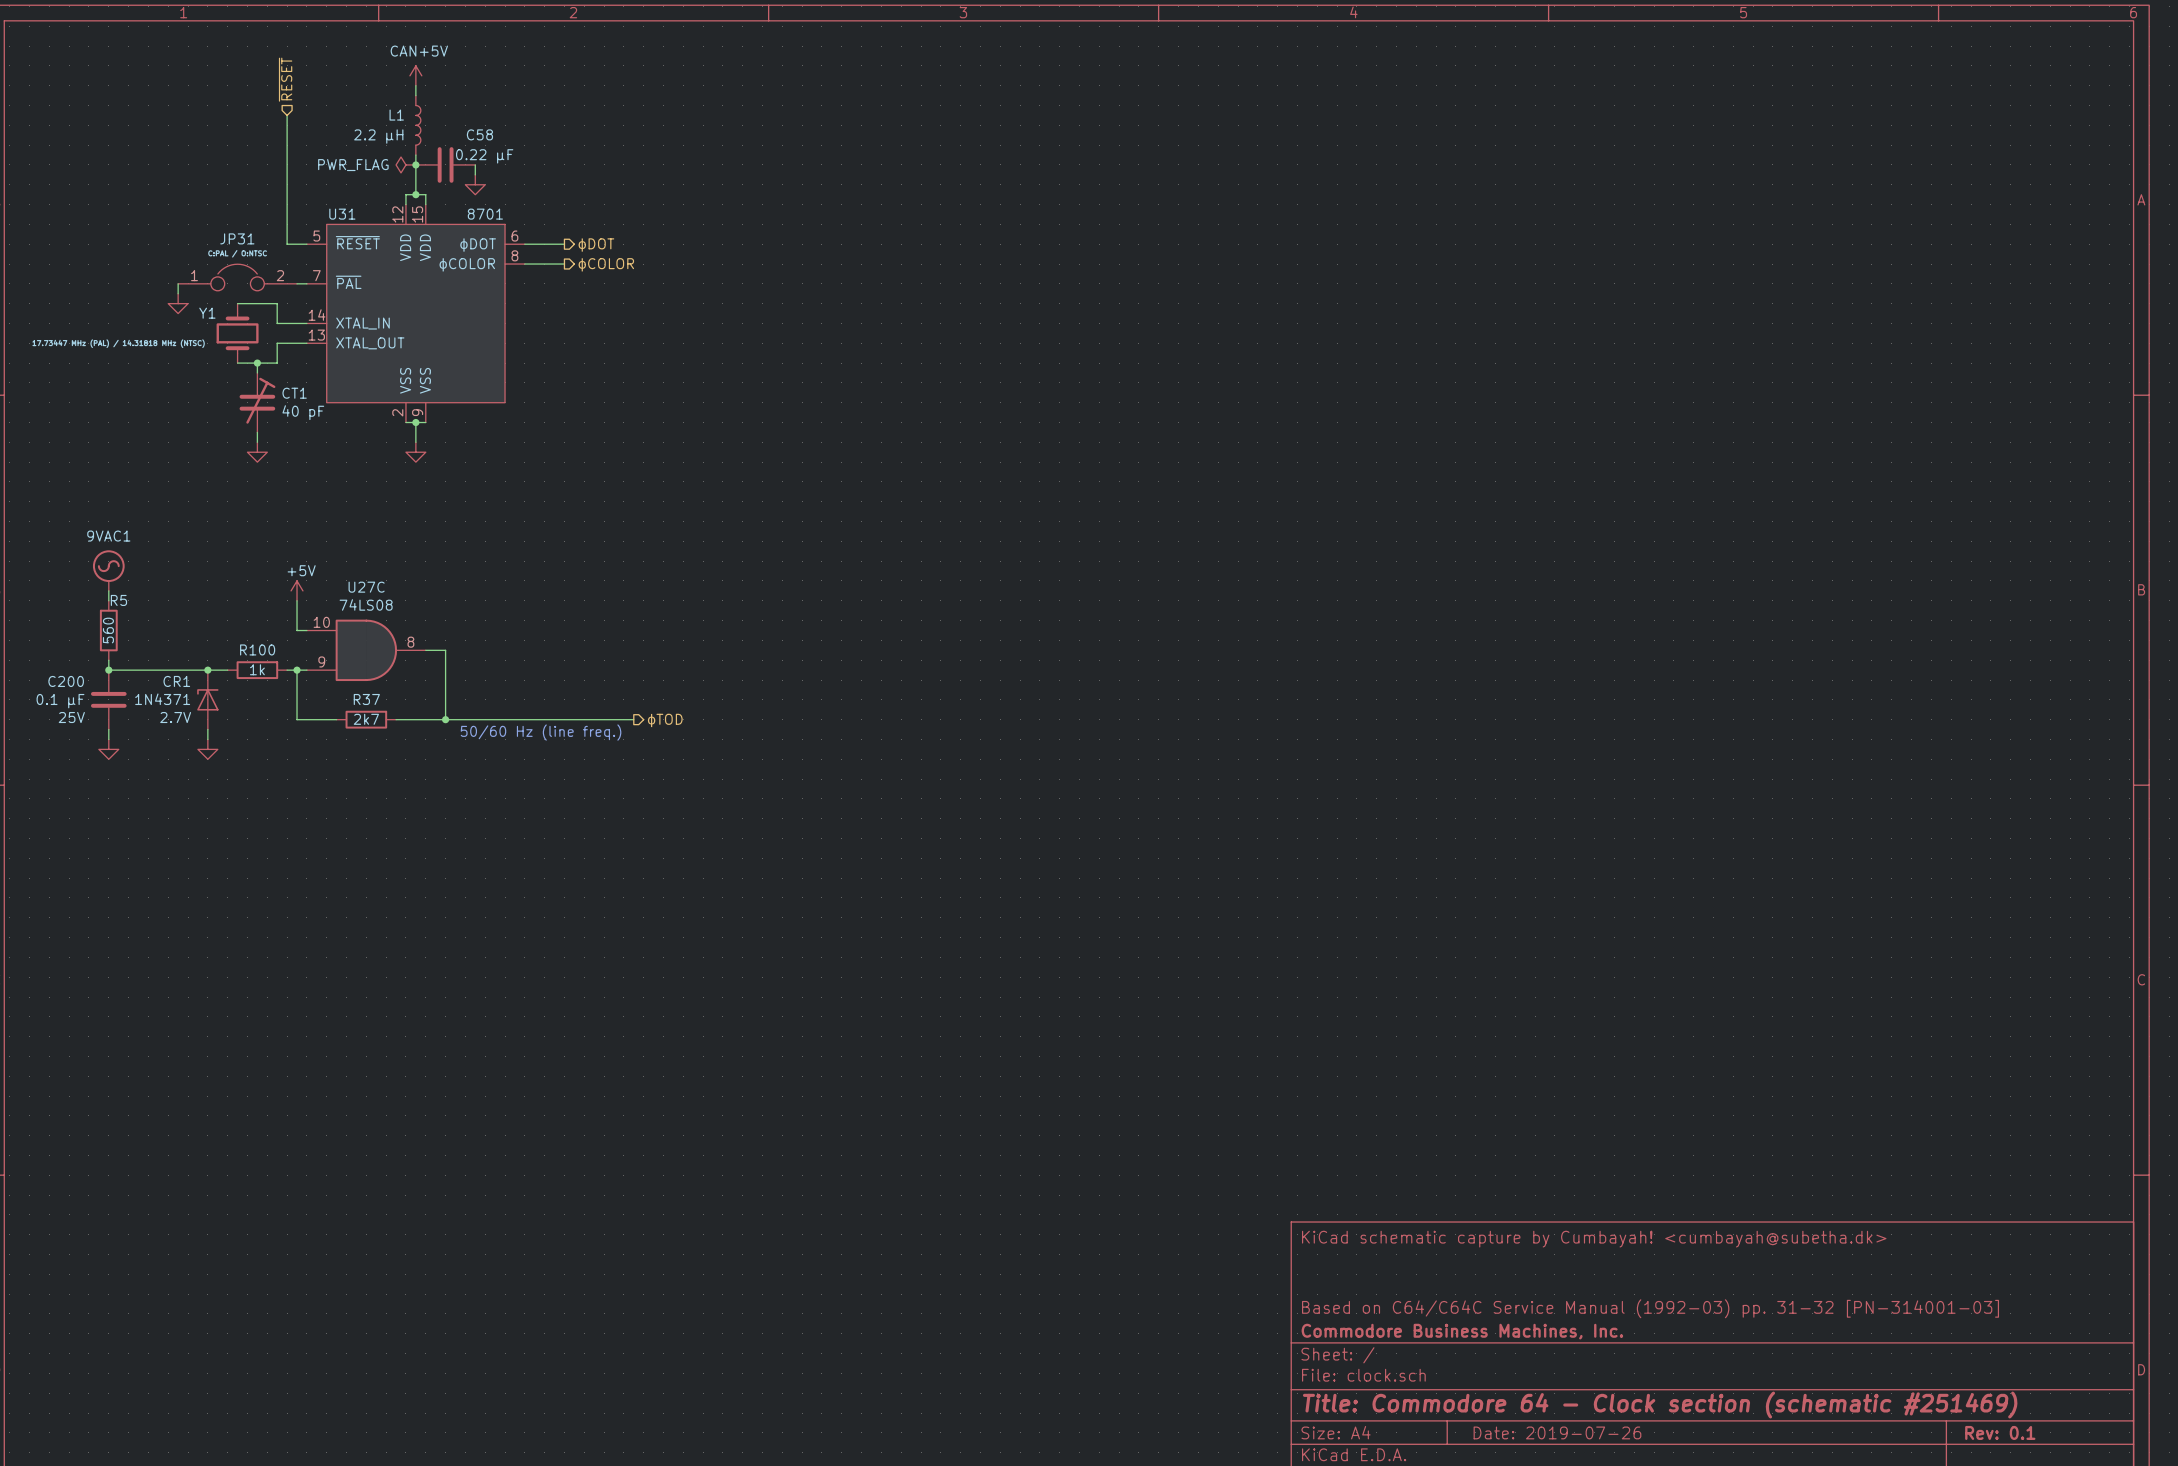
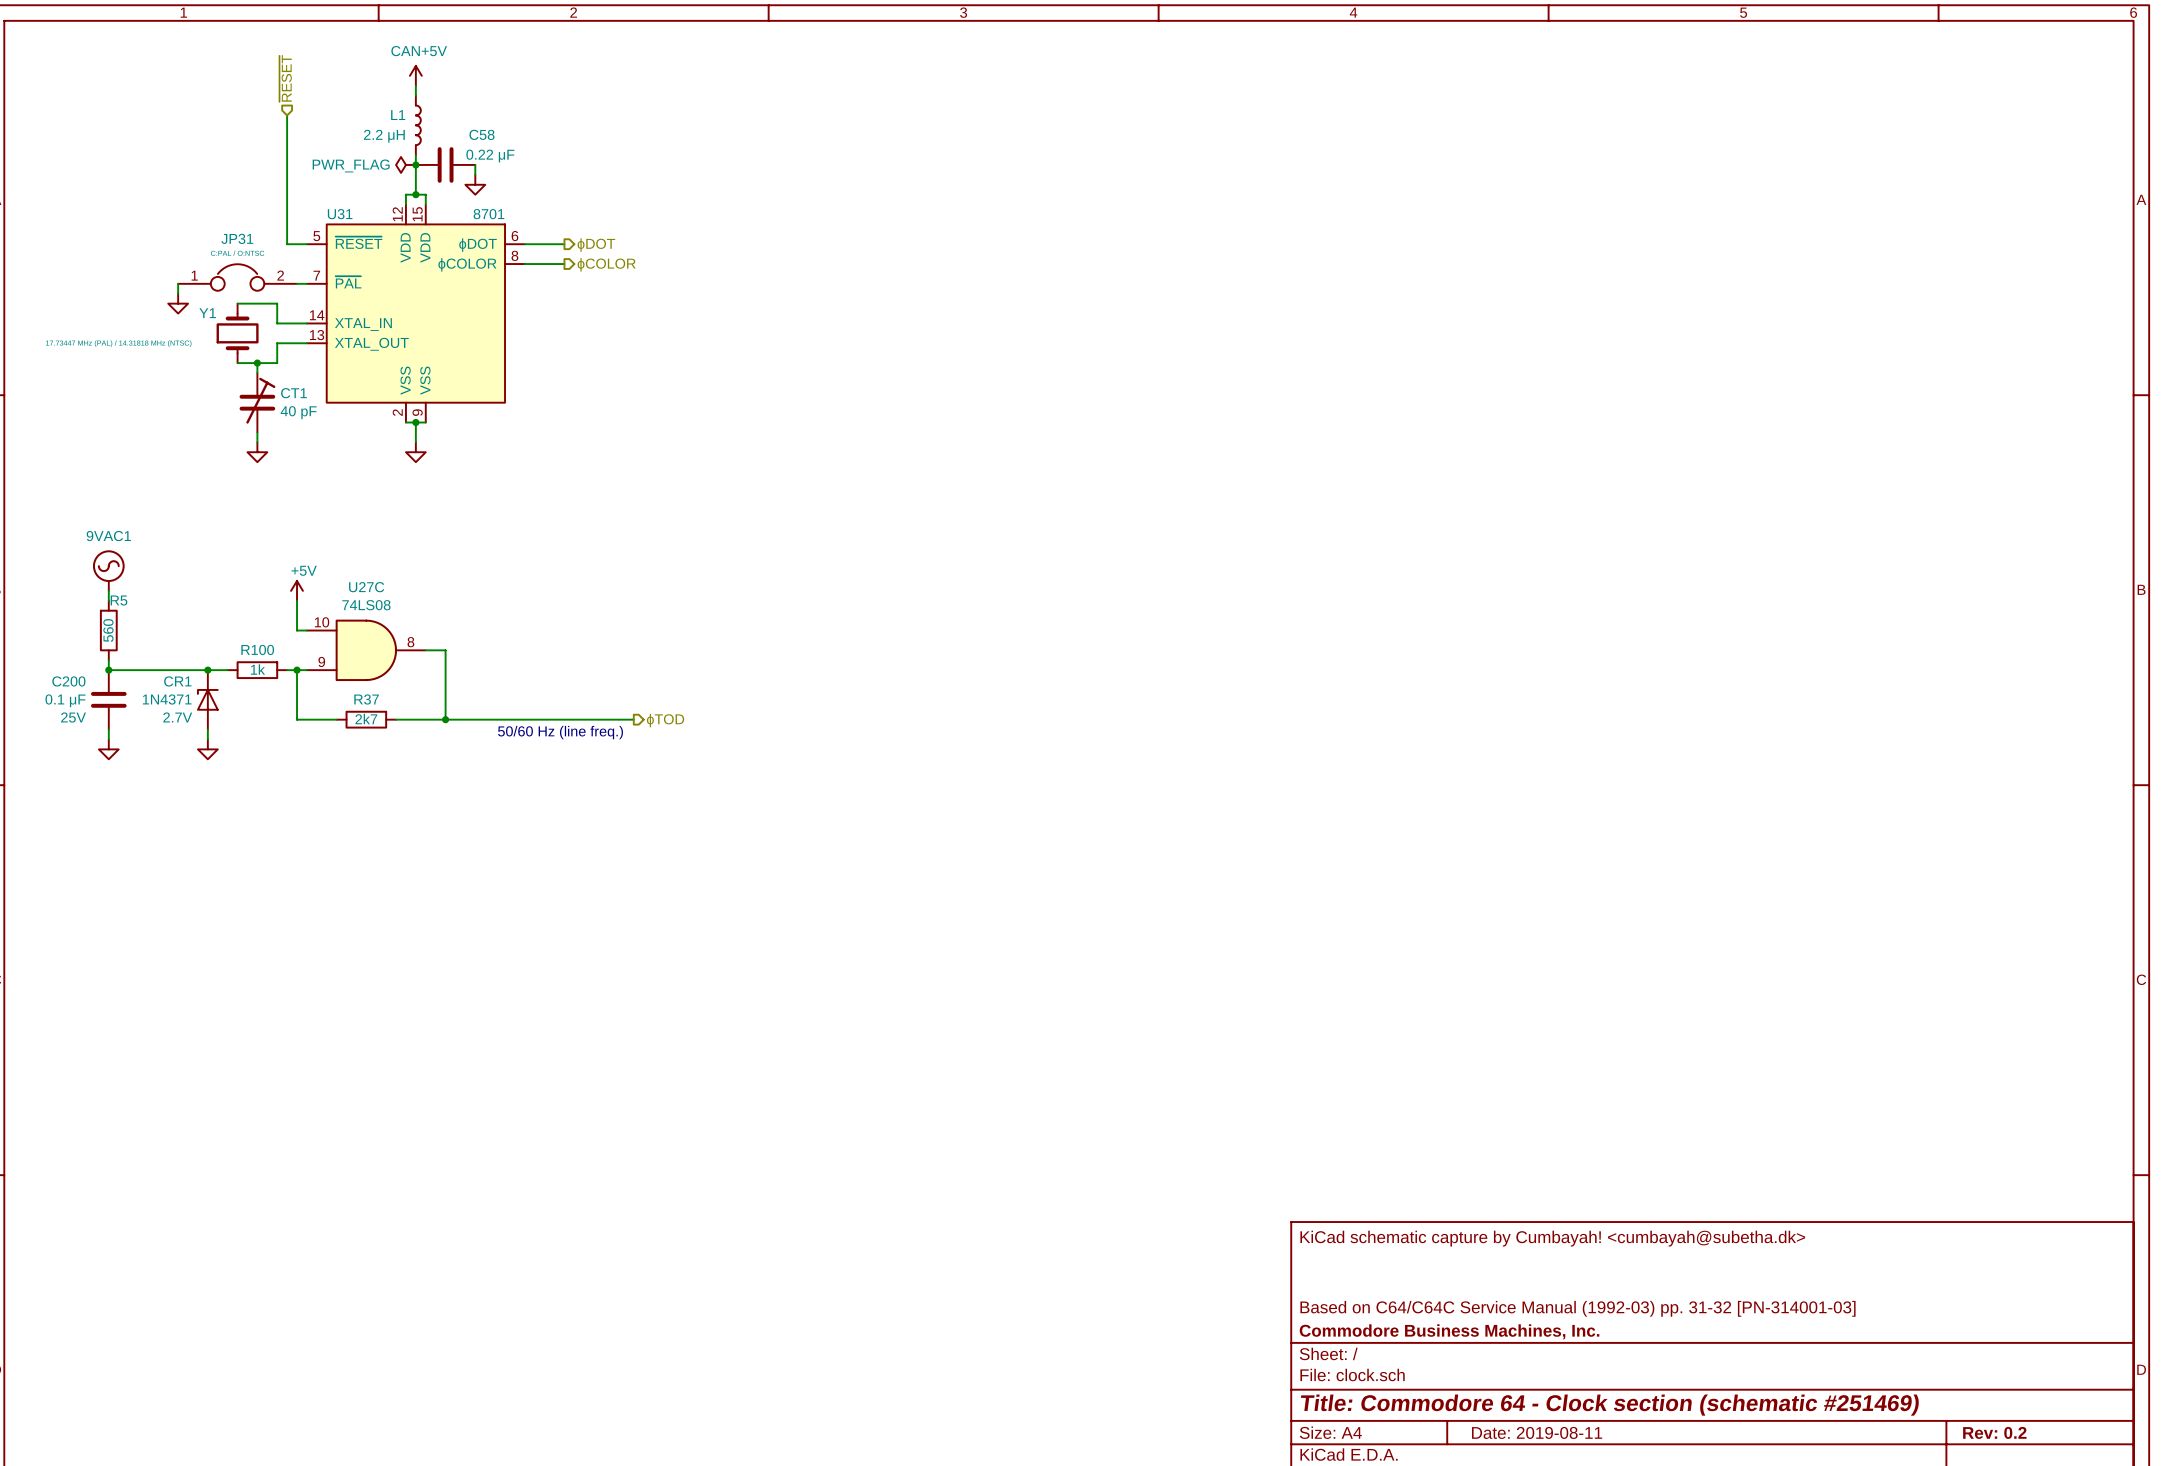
title block: Date: 2019-07-26 (1557, 1432) -> Date: 2019-08-11 (1537, 1432)
title block: Rev: 0.1 (2000, 1432) -> Rev: 0.2 (1994, 1432)

